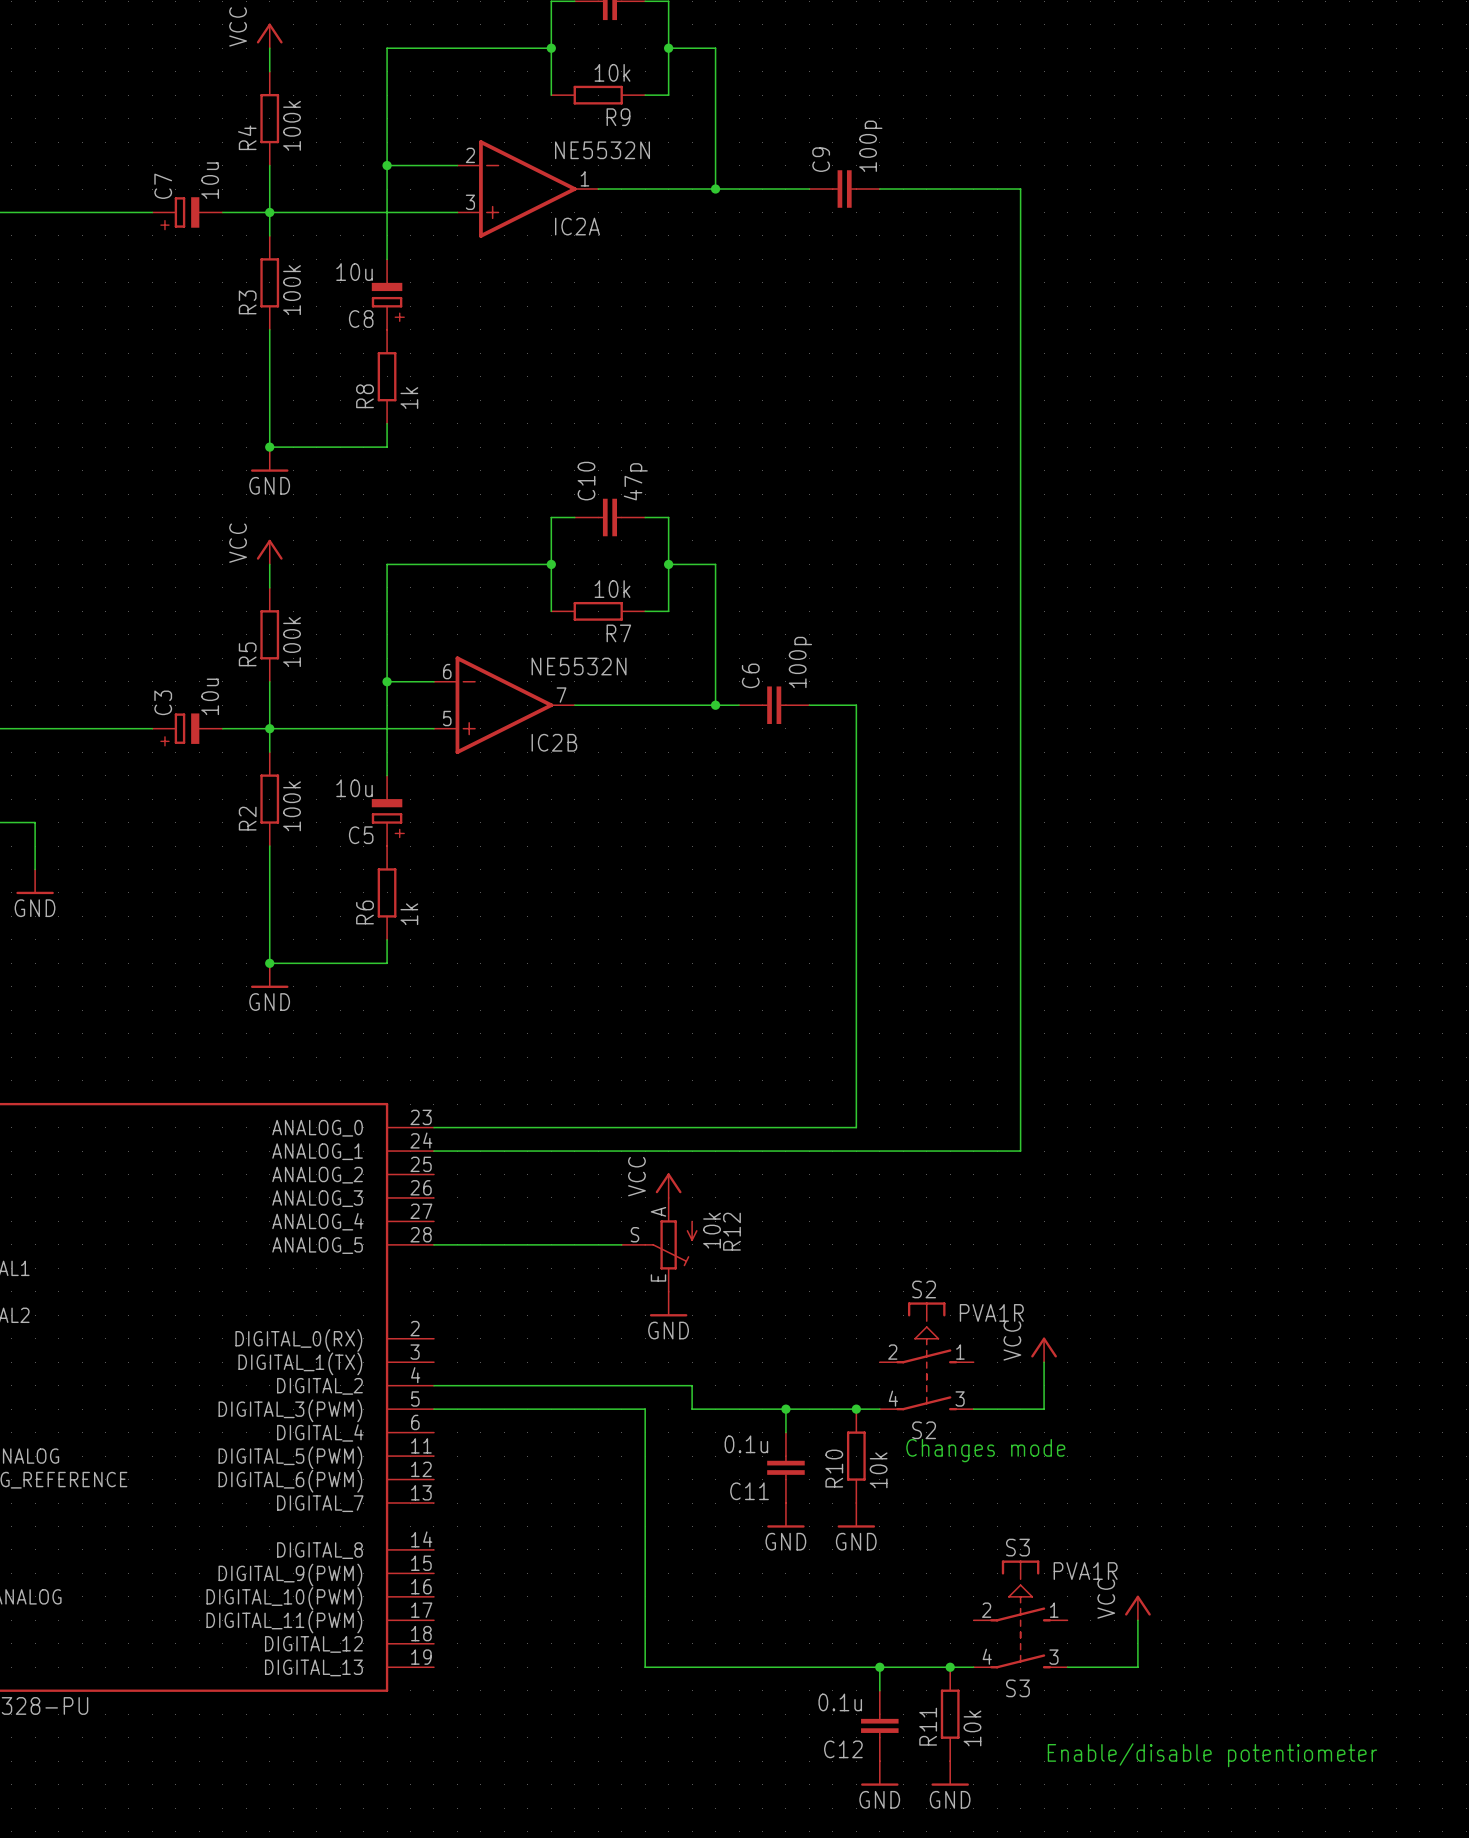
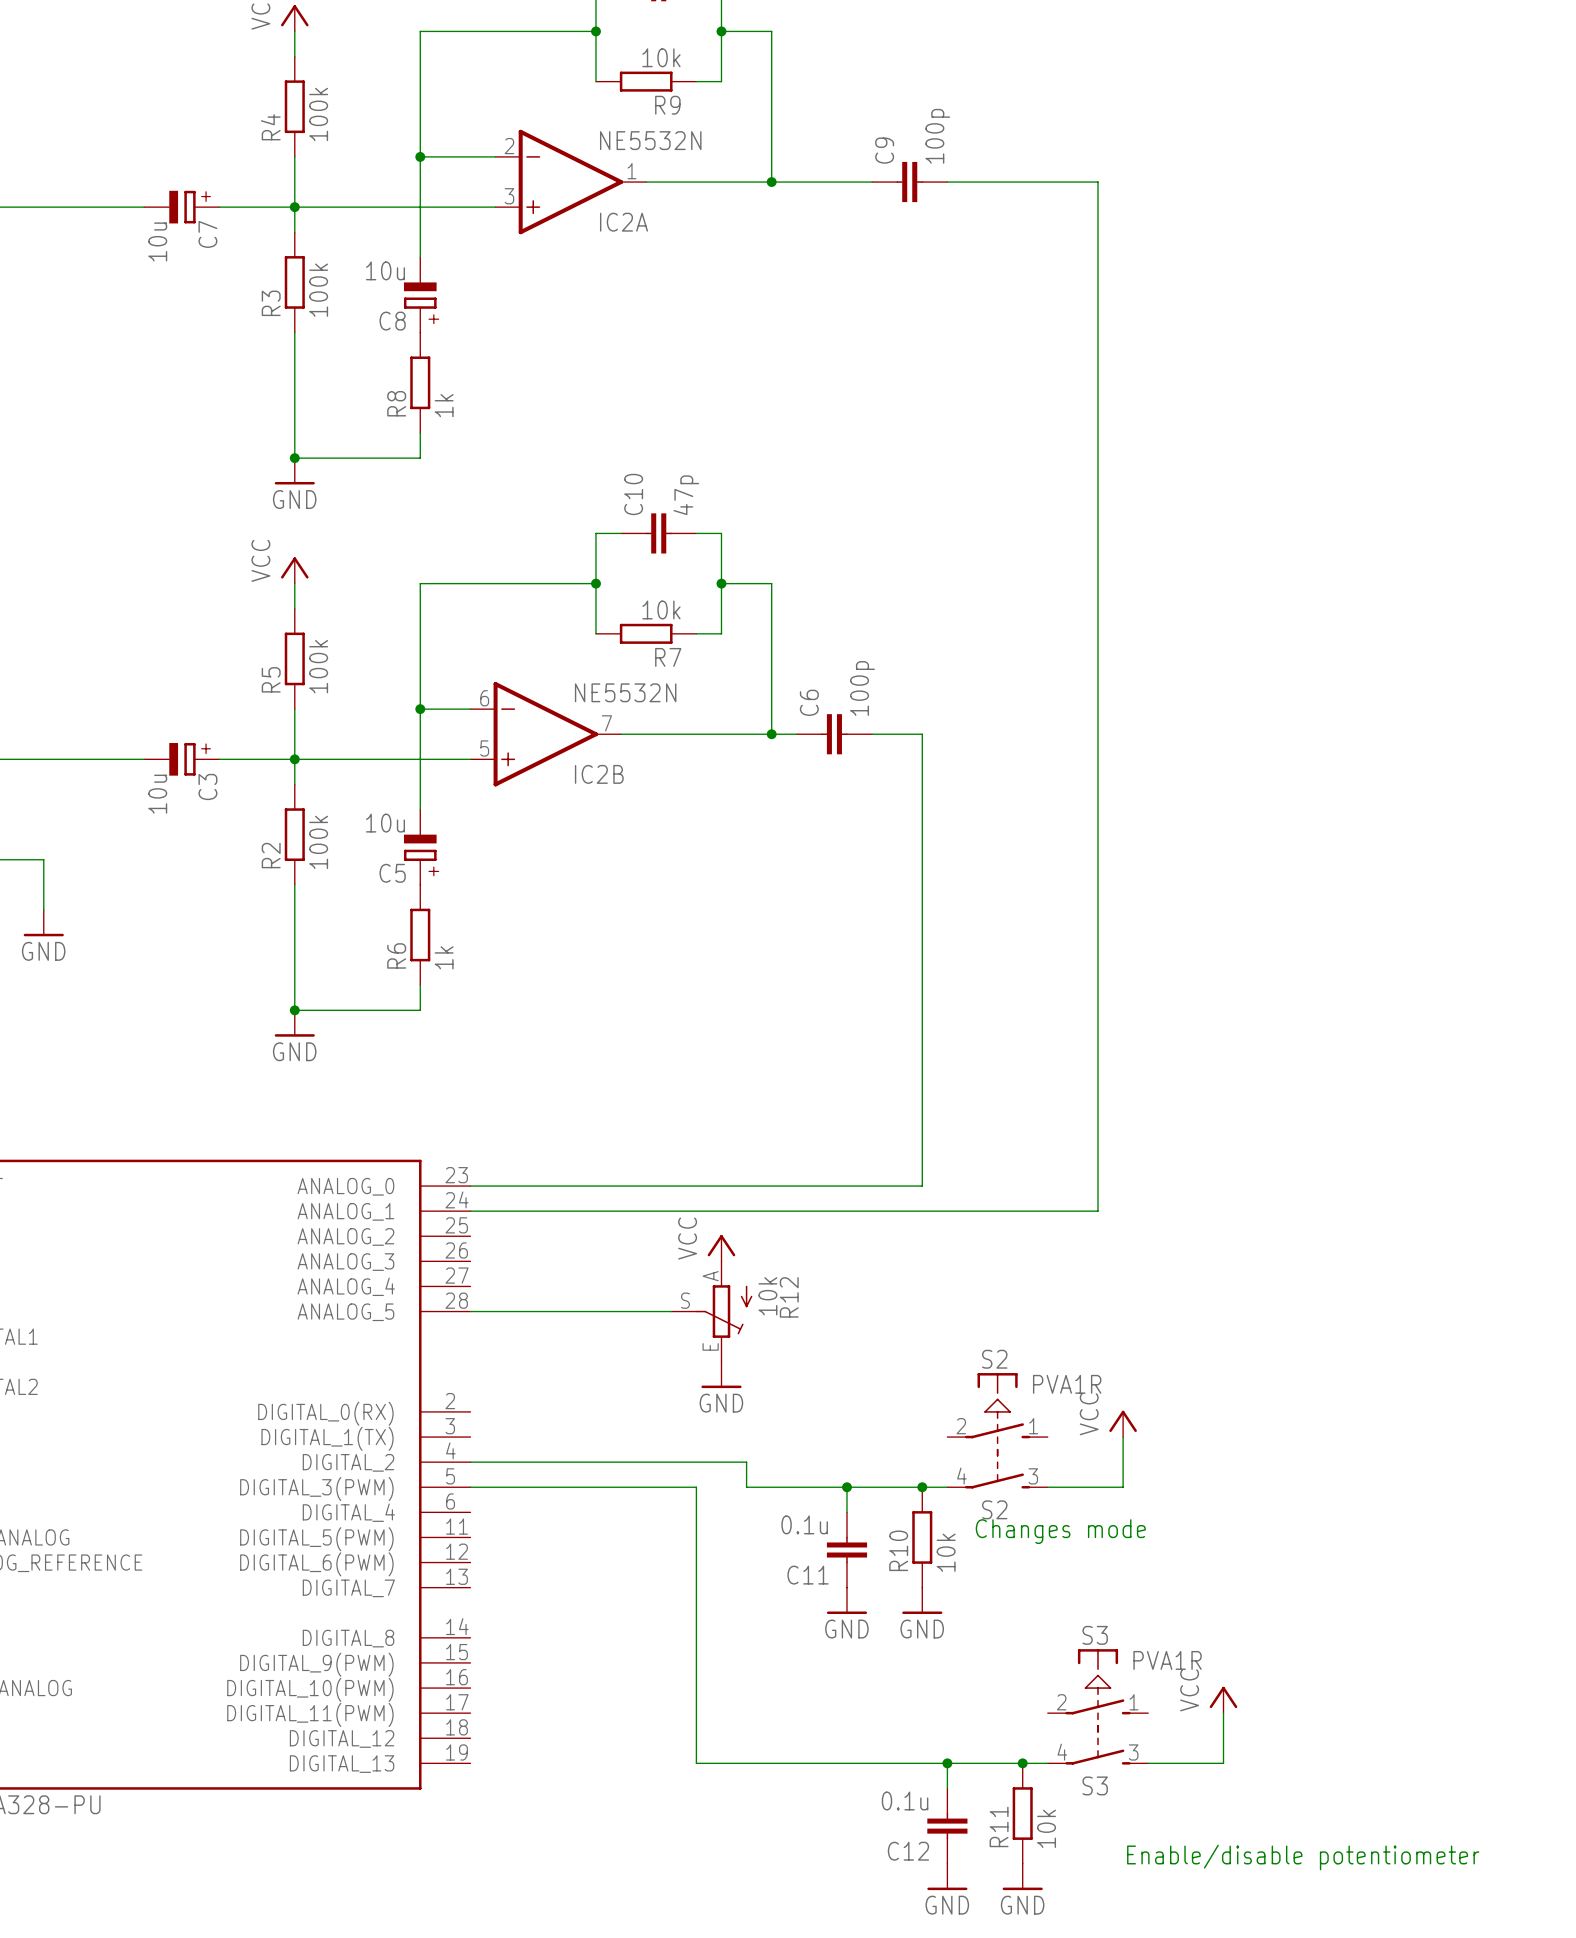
C7 value position: 10u (210, 180) -> 10u (157, 241)
C7 name position: C7 (163, 186) -> C7 (207, 234)
C7 symbol: [152, 197, 223, 228] -> [144, 190, 220, 224]
C3 value position: 10u (210, 696) -> 10u (157, 794)
C3 name position: C3 (163, 702) -> C3 (207, 786)
C3 symbol: [152, 713, 223, 744] -> [144, 743, 220, 776]

